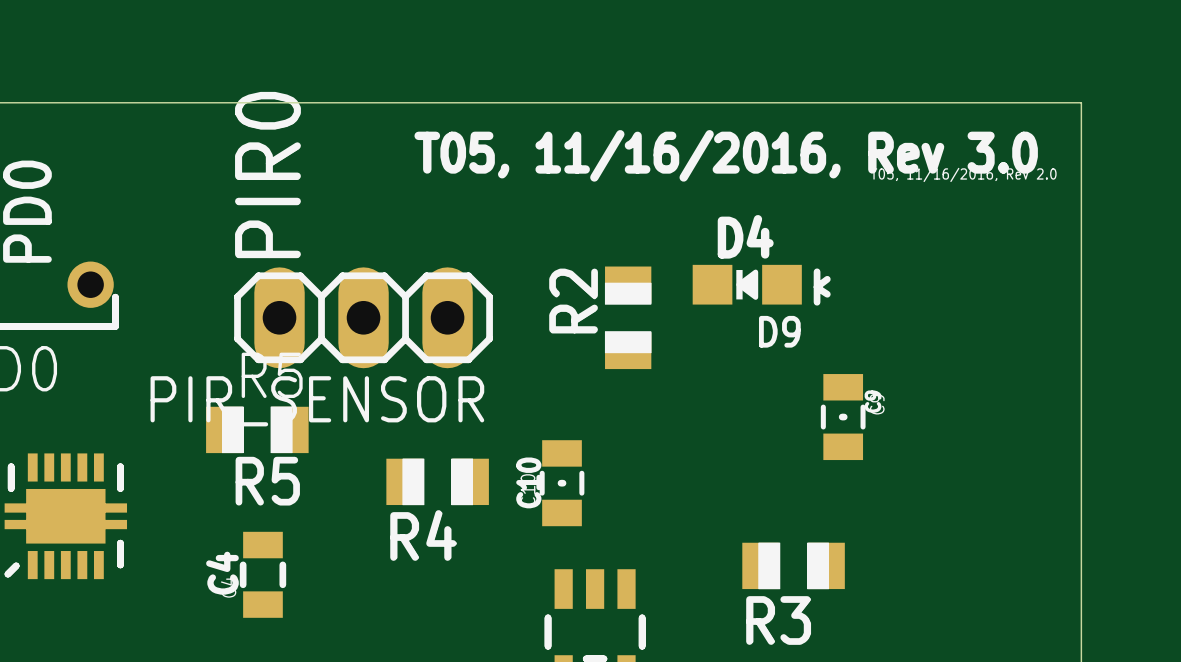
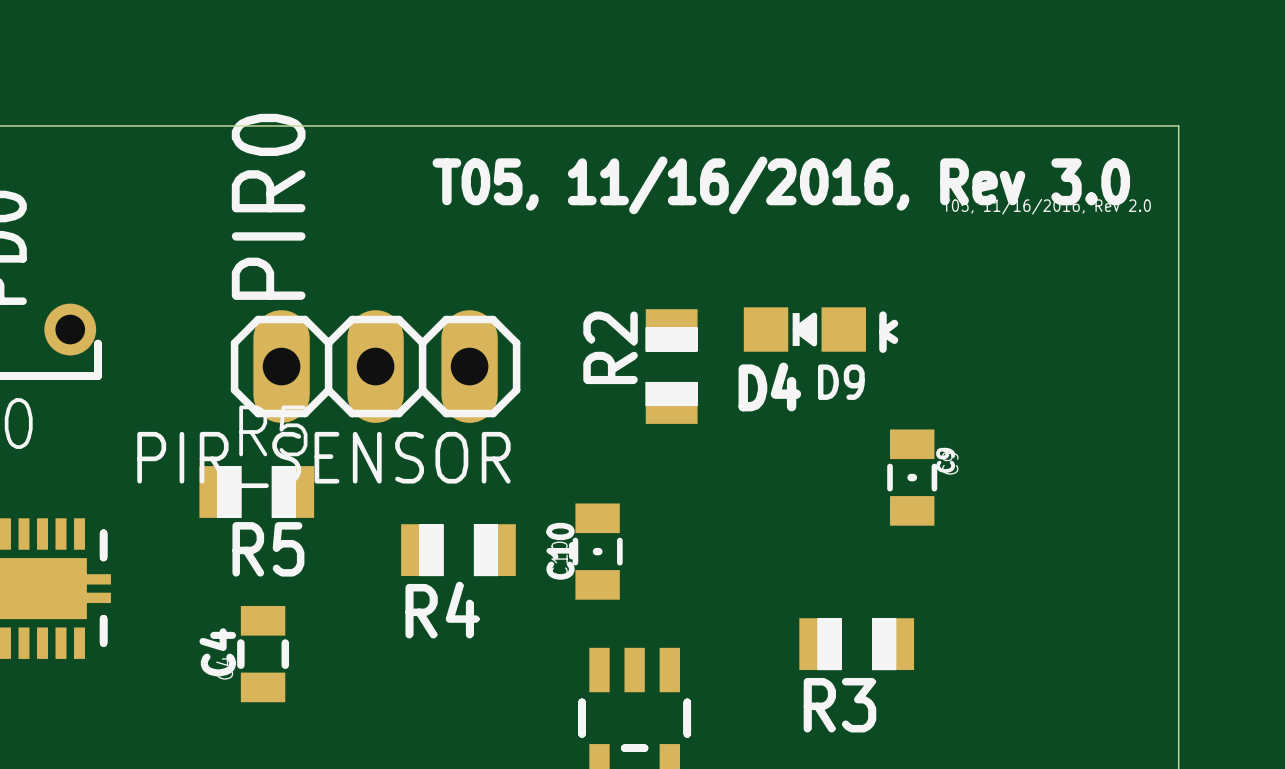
text position: D4 (745, 236) -> D4 (769, 386)

